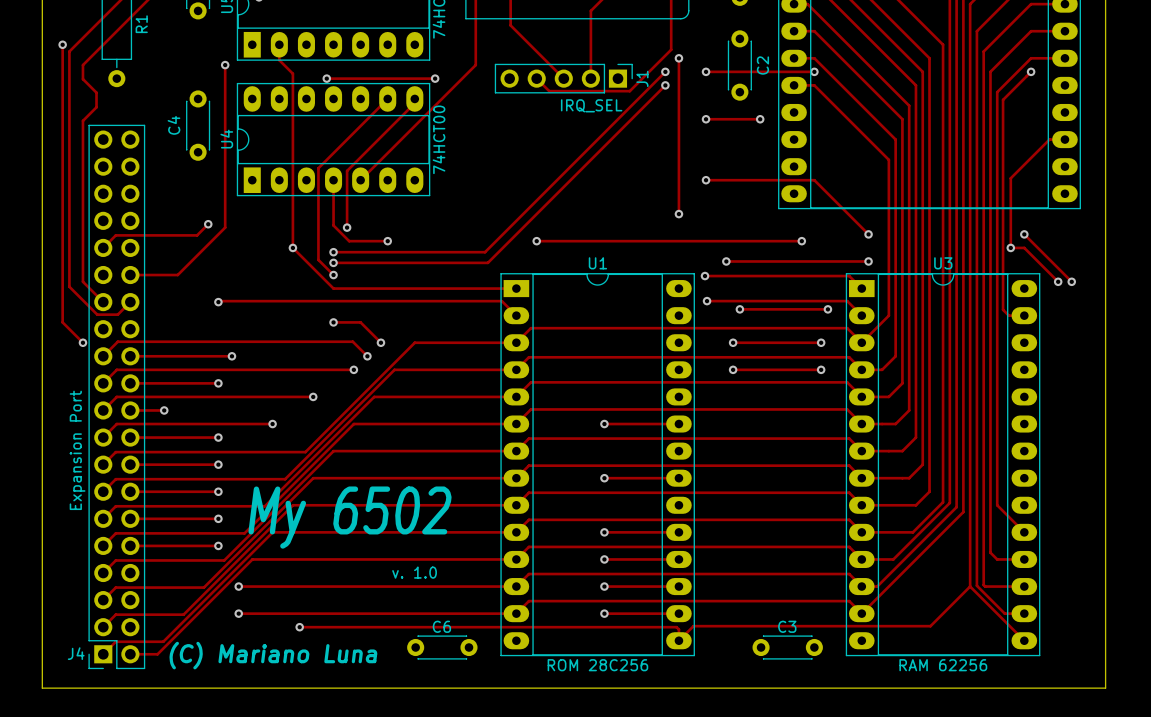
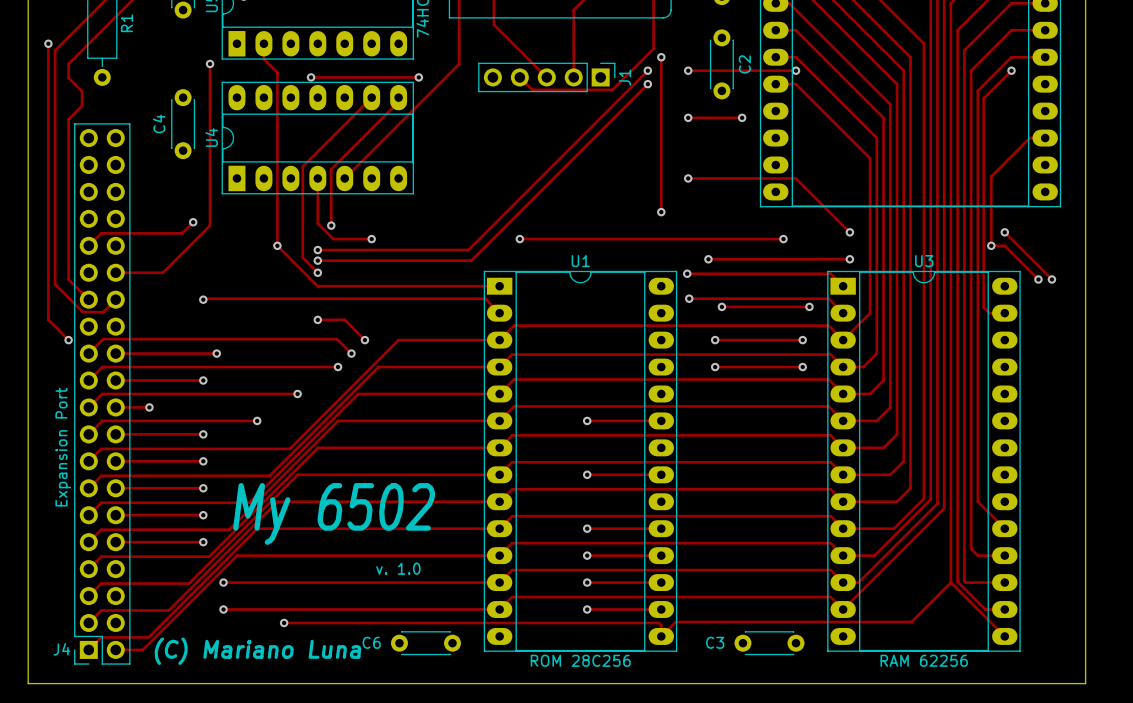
J1 value: IRQ_SEL (591, 105) -> none
U4 value: 74HCT00 (439, 139) -> none
C6 name position: C6 (441, 626) -> C6 (371, 642)
C3 name position: C3 (787, 626) -> C3 (715, 642)

